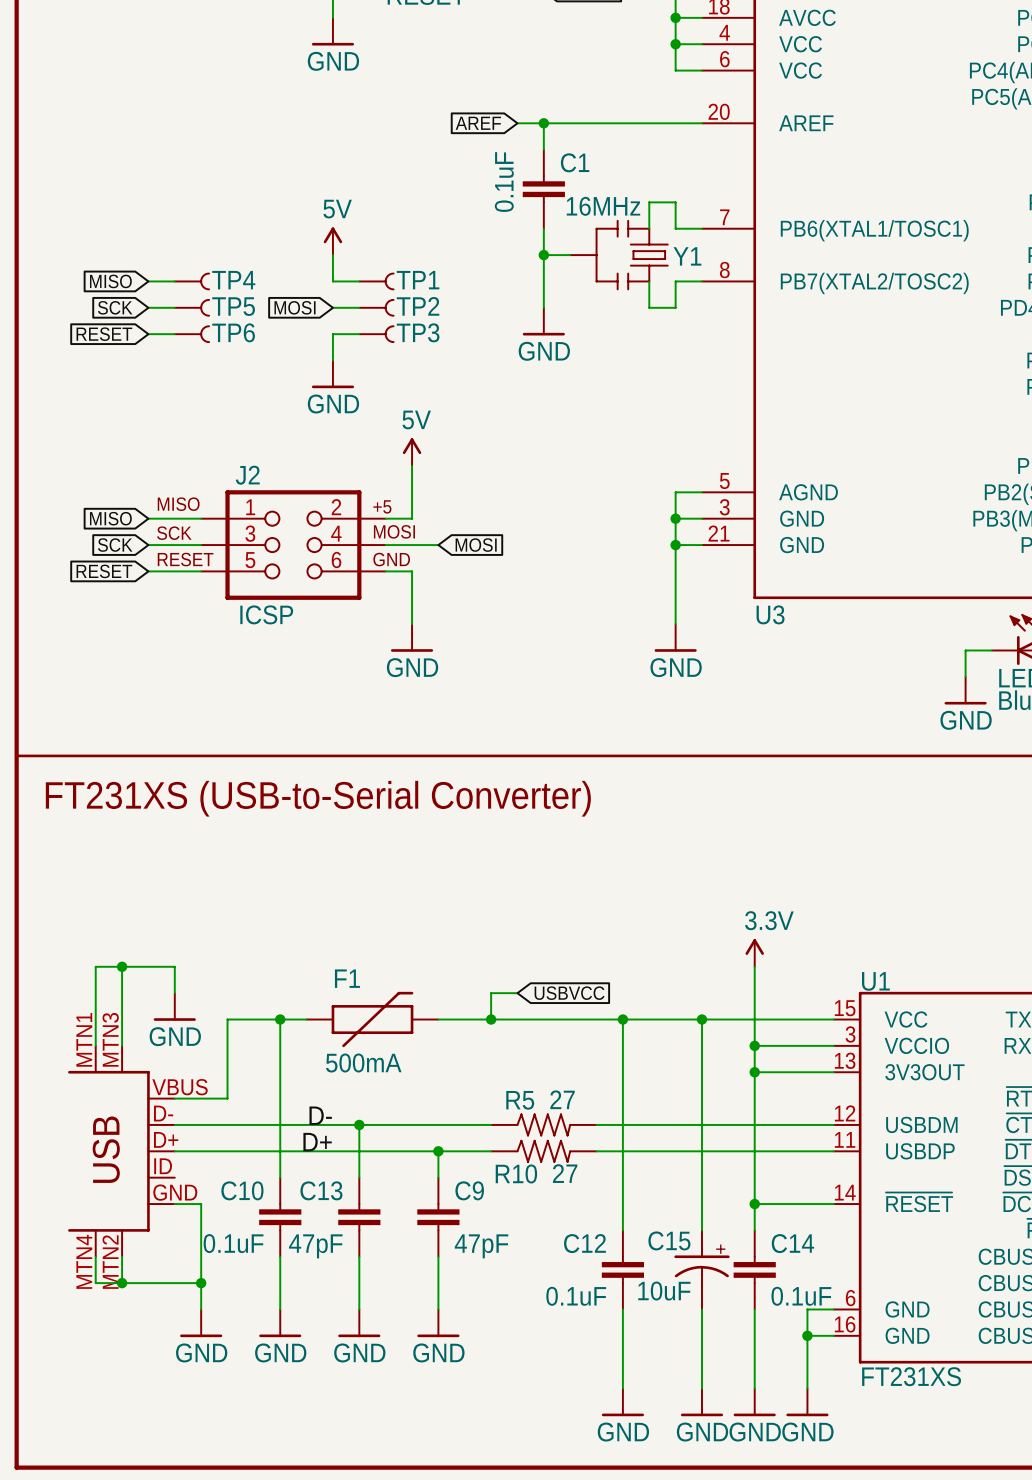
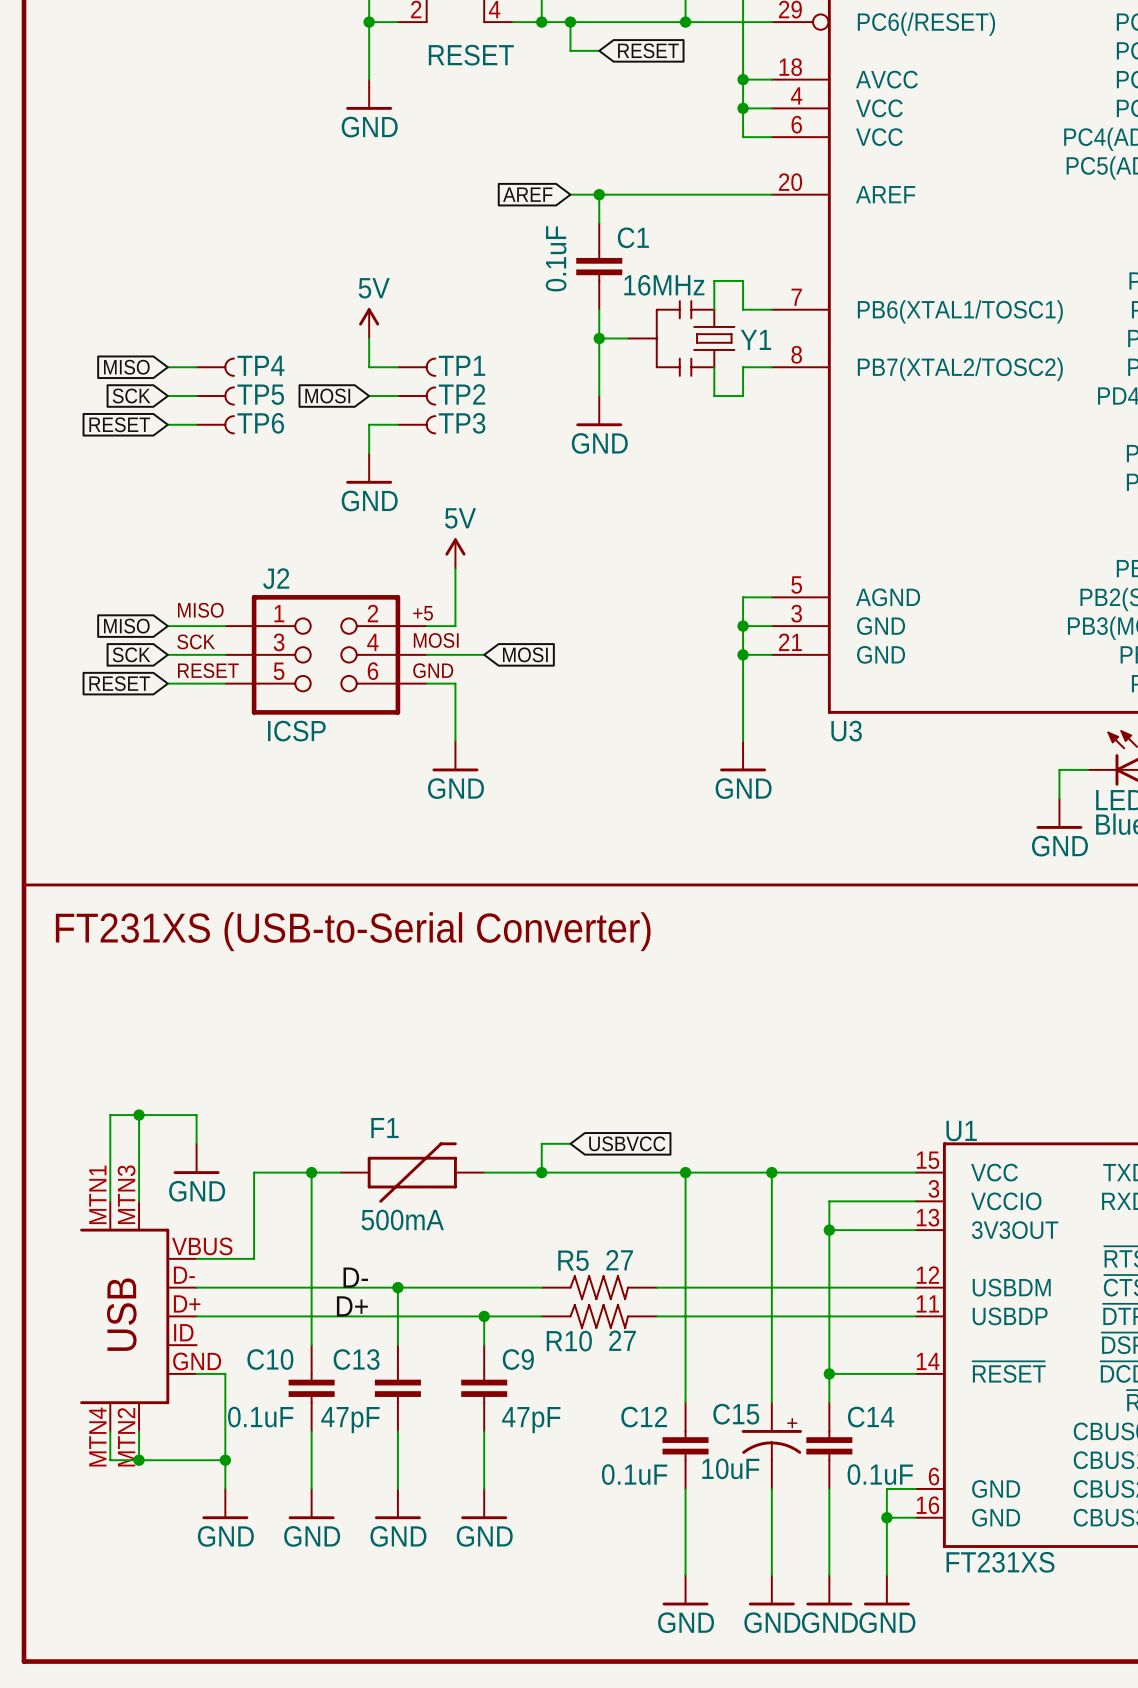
power symbol: 3.3V (754, 952) -> none
wire: (754, 966) (754, 1045) -> none
junction: (754, 1045) -> none

